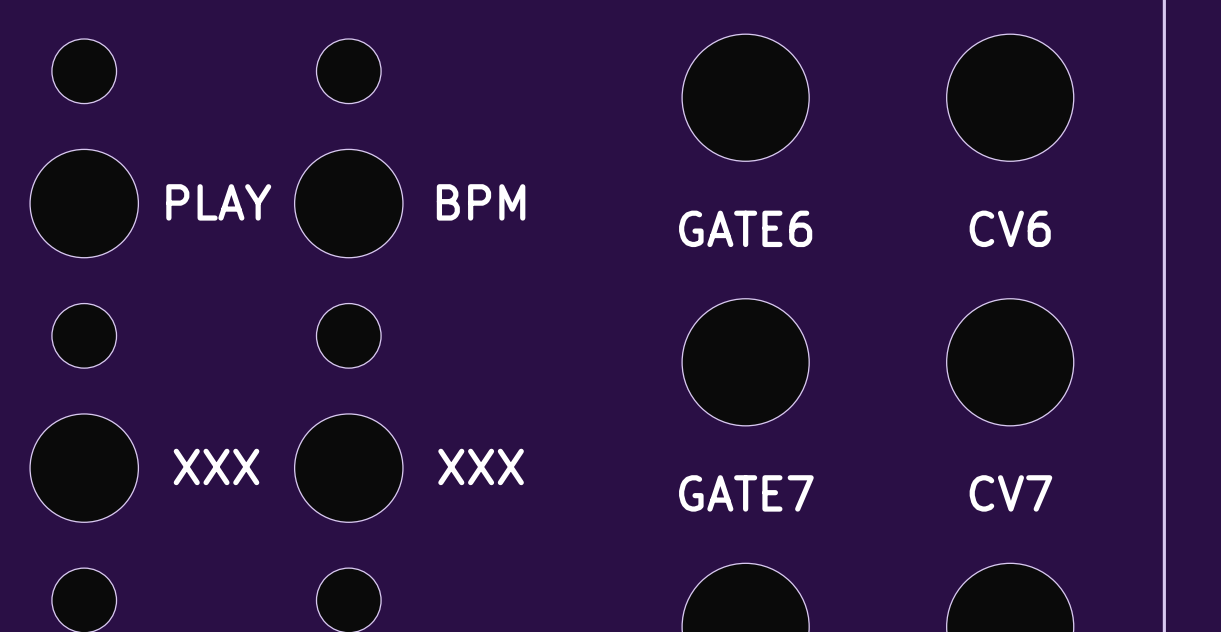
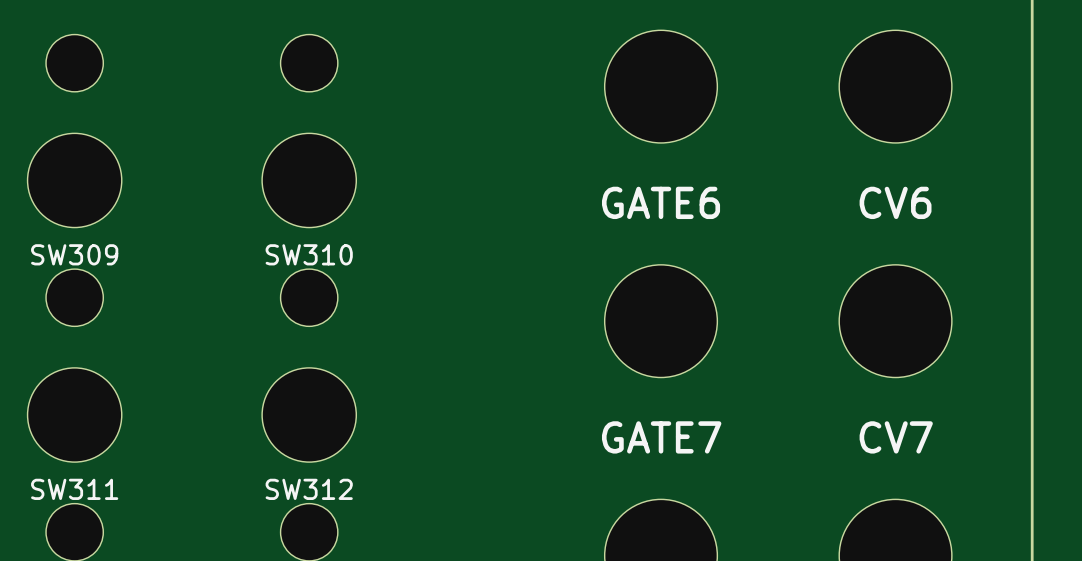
PLAY: (84, 203) -> none
SW309: none -> (74, 180)
BPM: (348, 203) -> none
SW310: none -> (309, 180)
XXX: (84, 468) -> none
SW311: none -> (74, 414)
XXX: (348, 468) -> none
SW312: none -> (309, 414)

